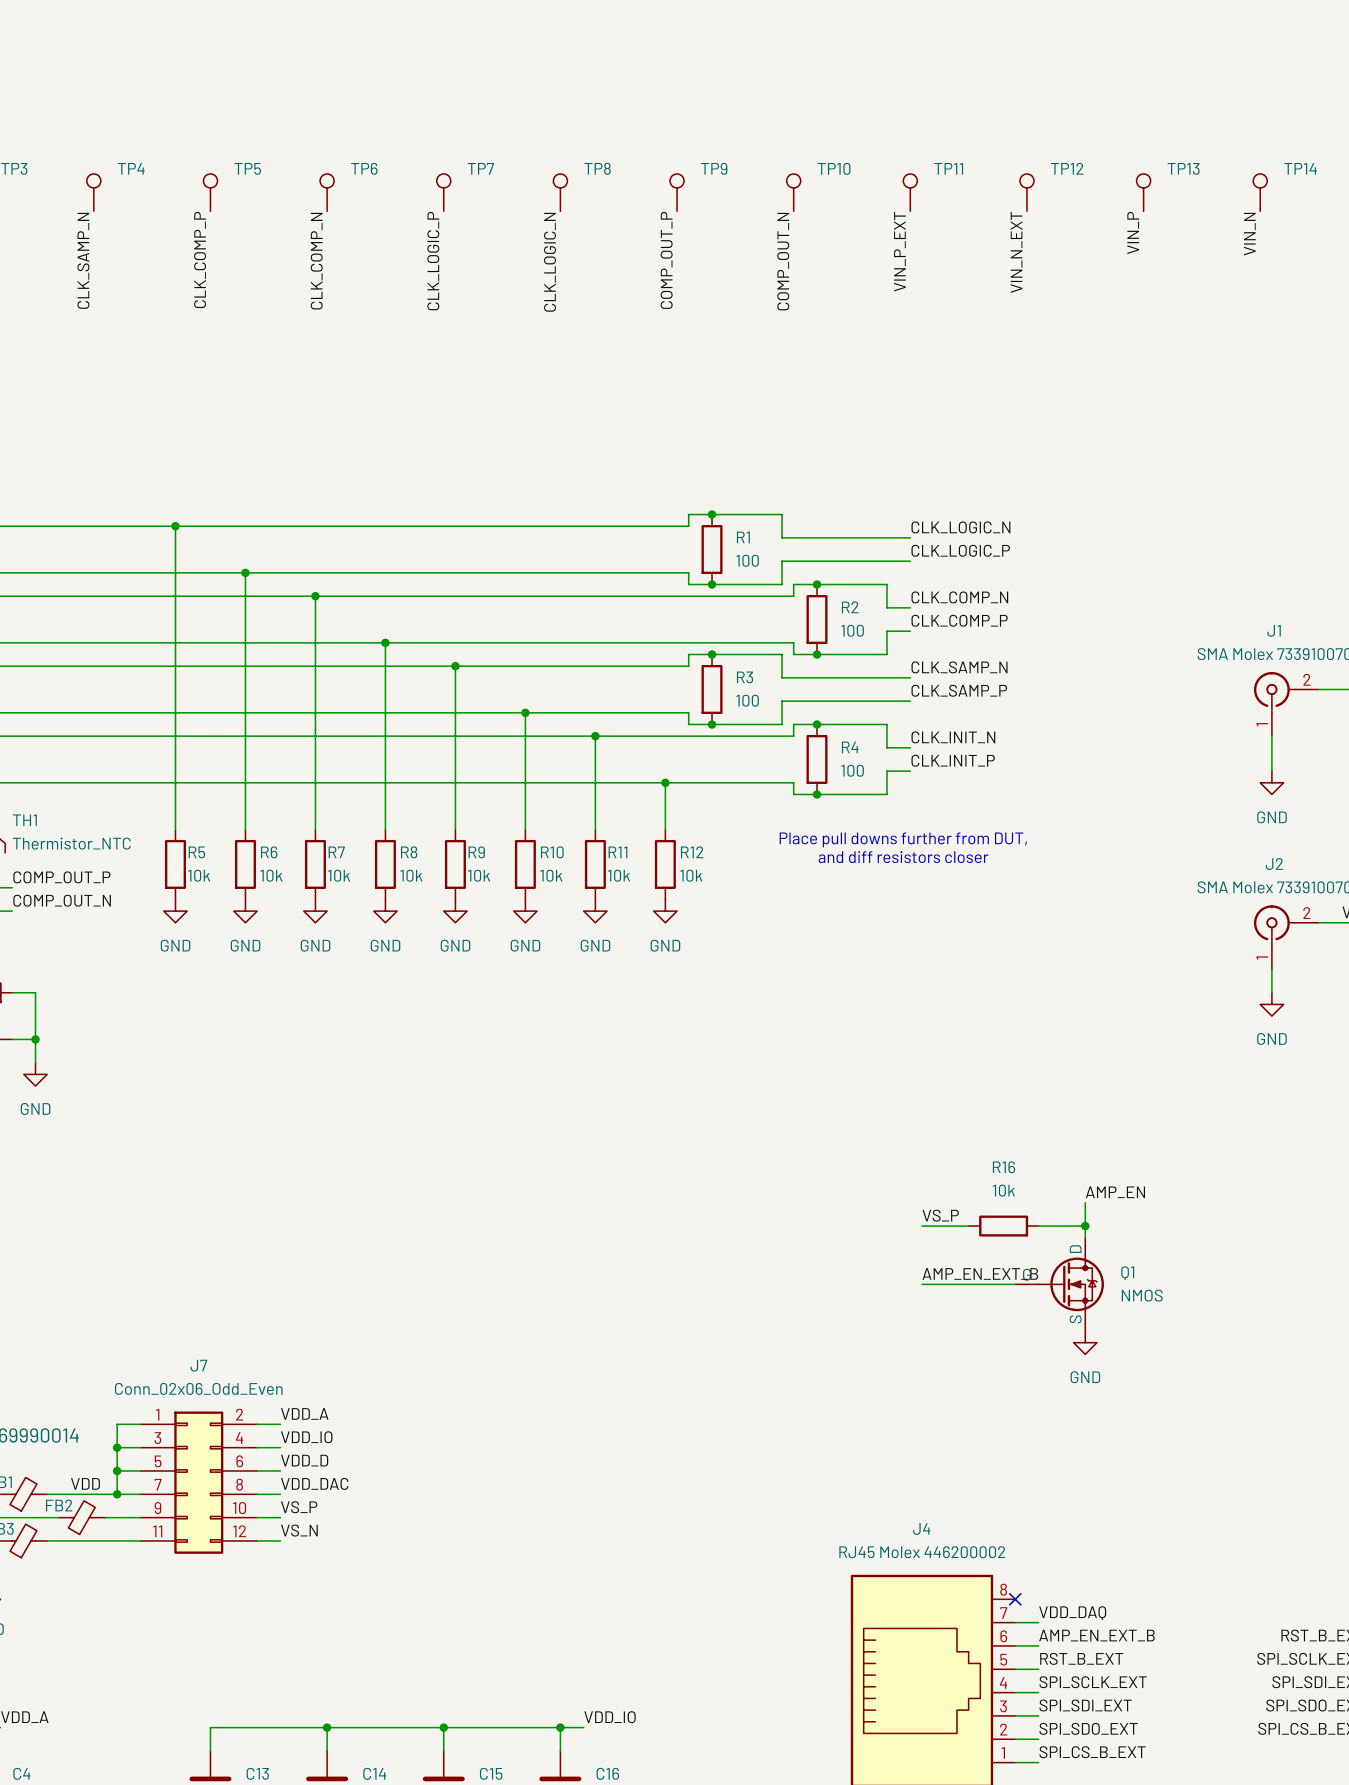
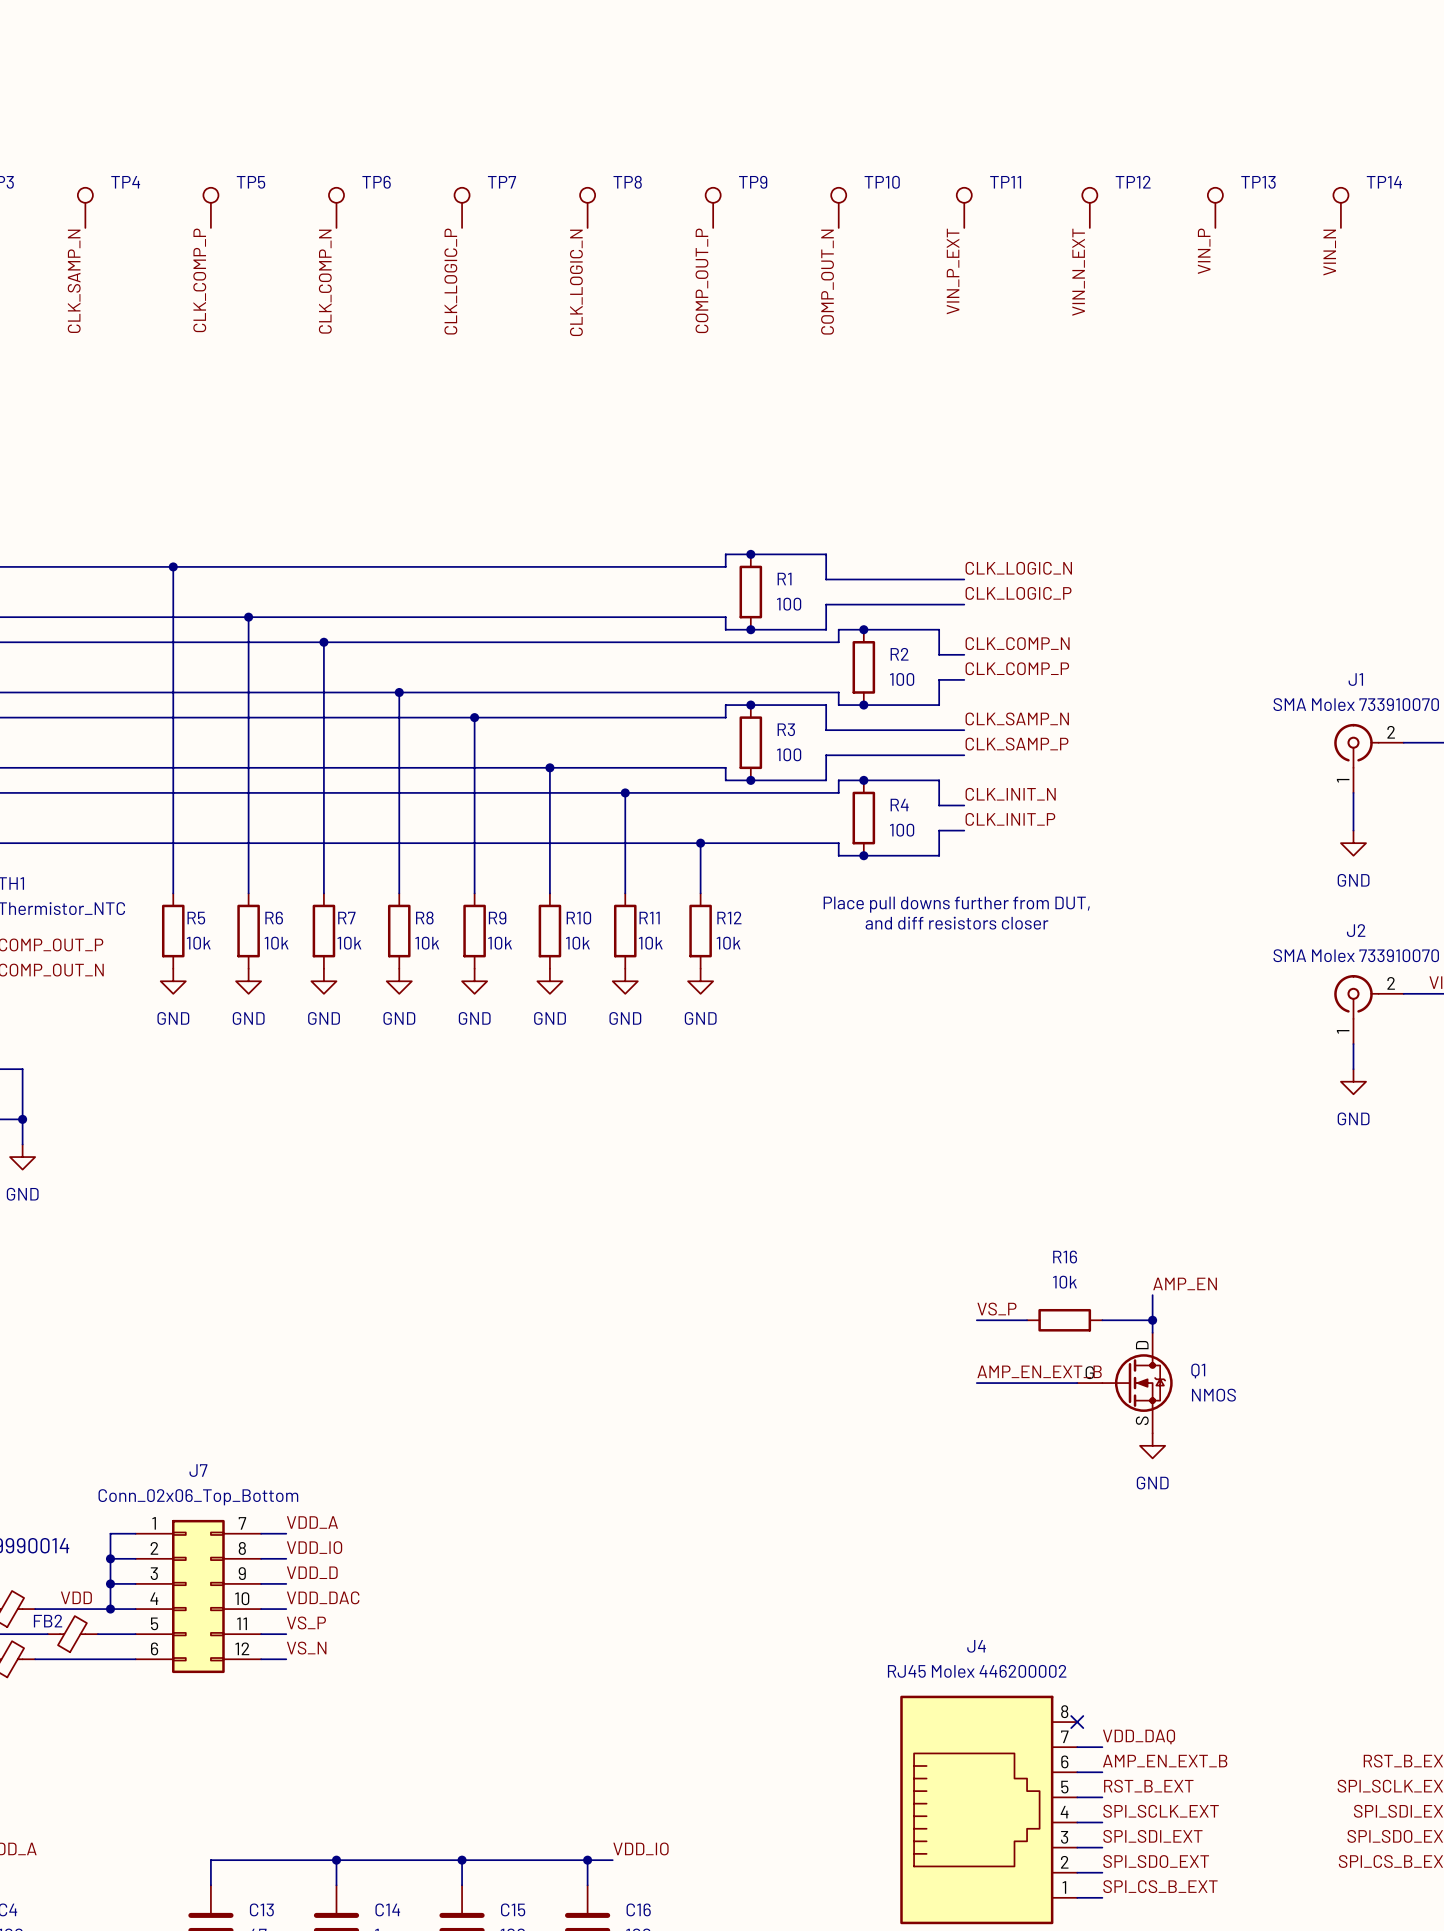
J7 value: Conn_02x06_Odd_Even (198, 1388) -> Conn_02x06_Top_Bottom (198, 1497)
J7 symbol: [140, 1411, 258, 1554] -> [135, 1519, 262, 1674]

